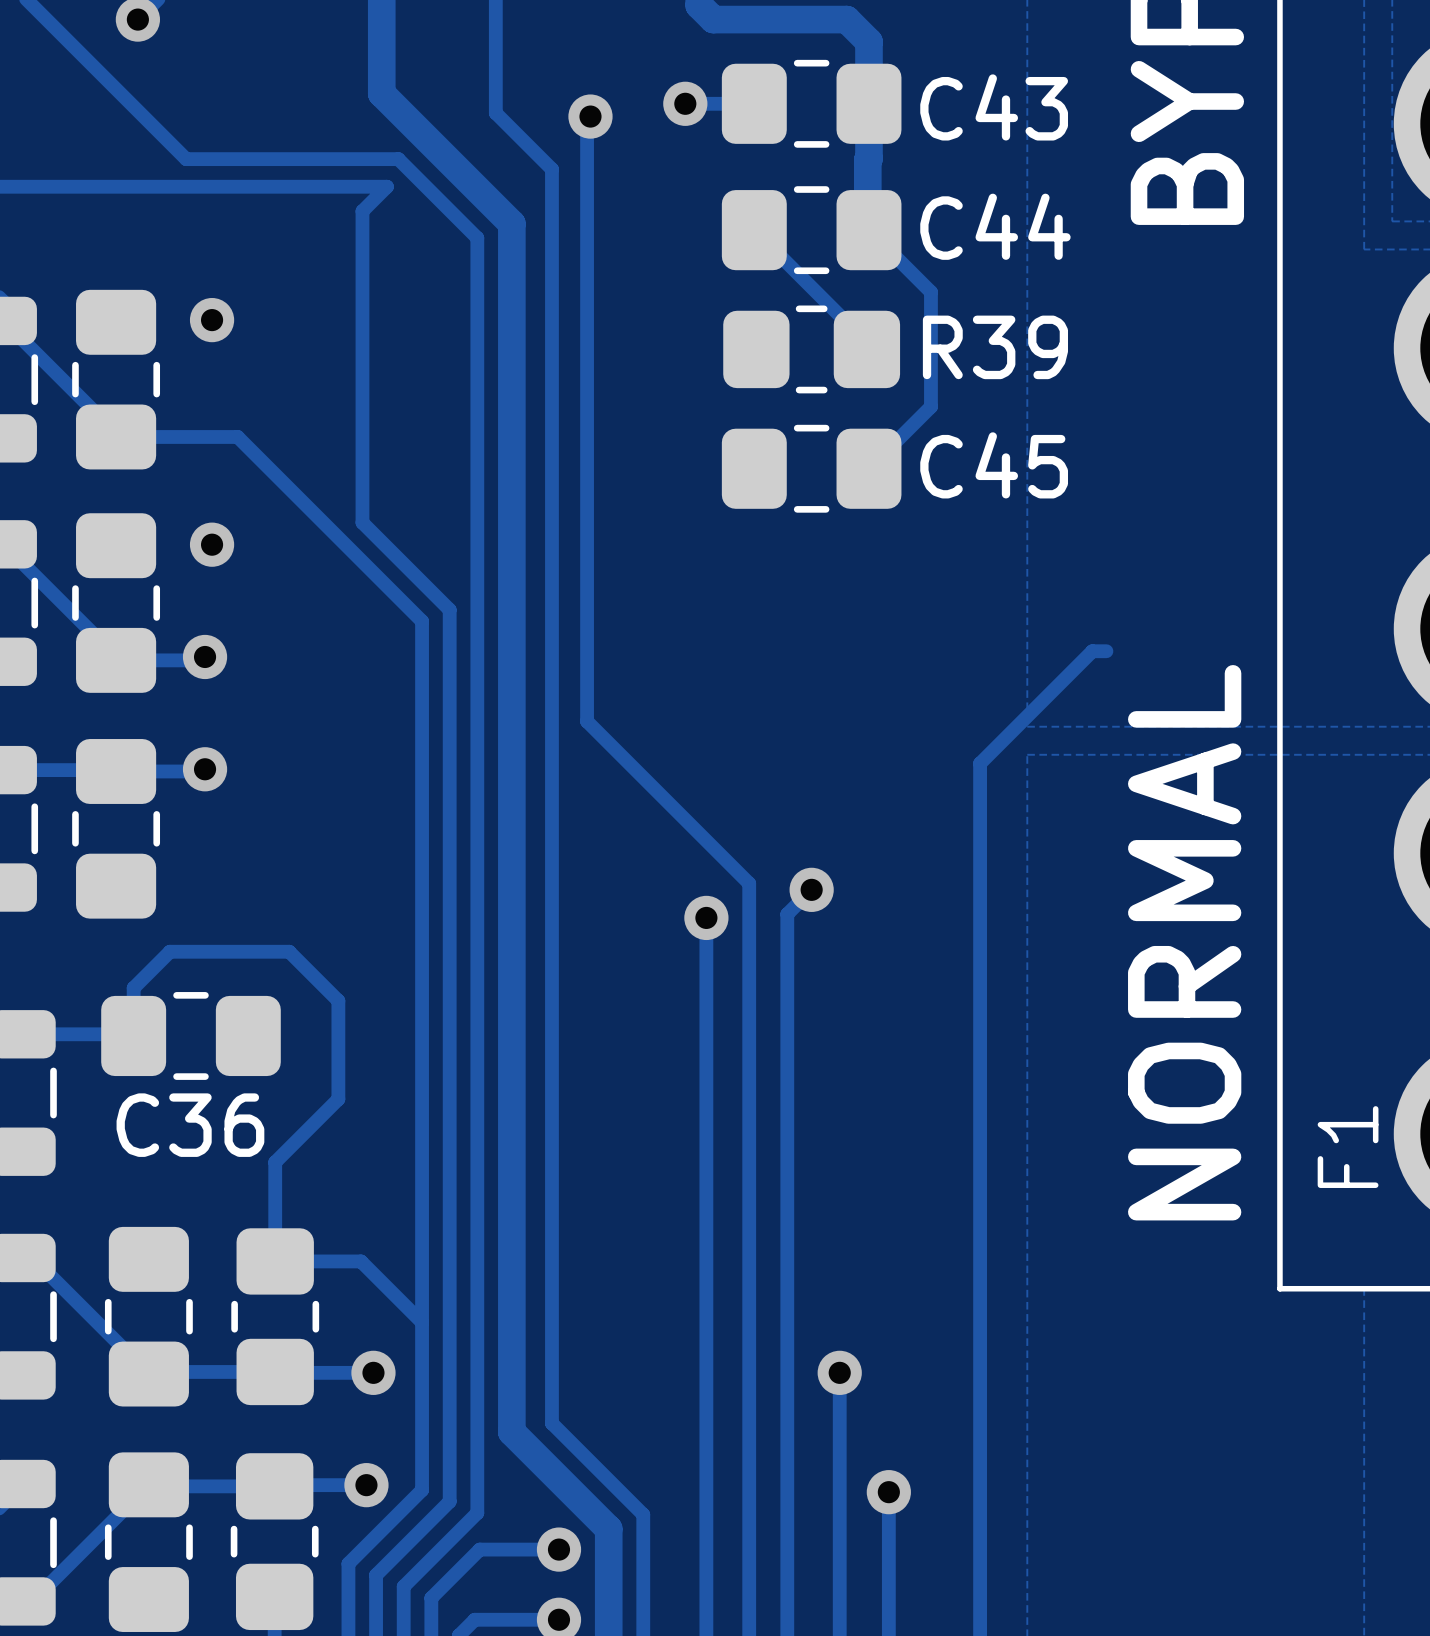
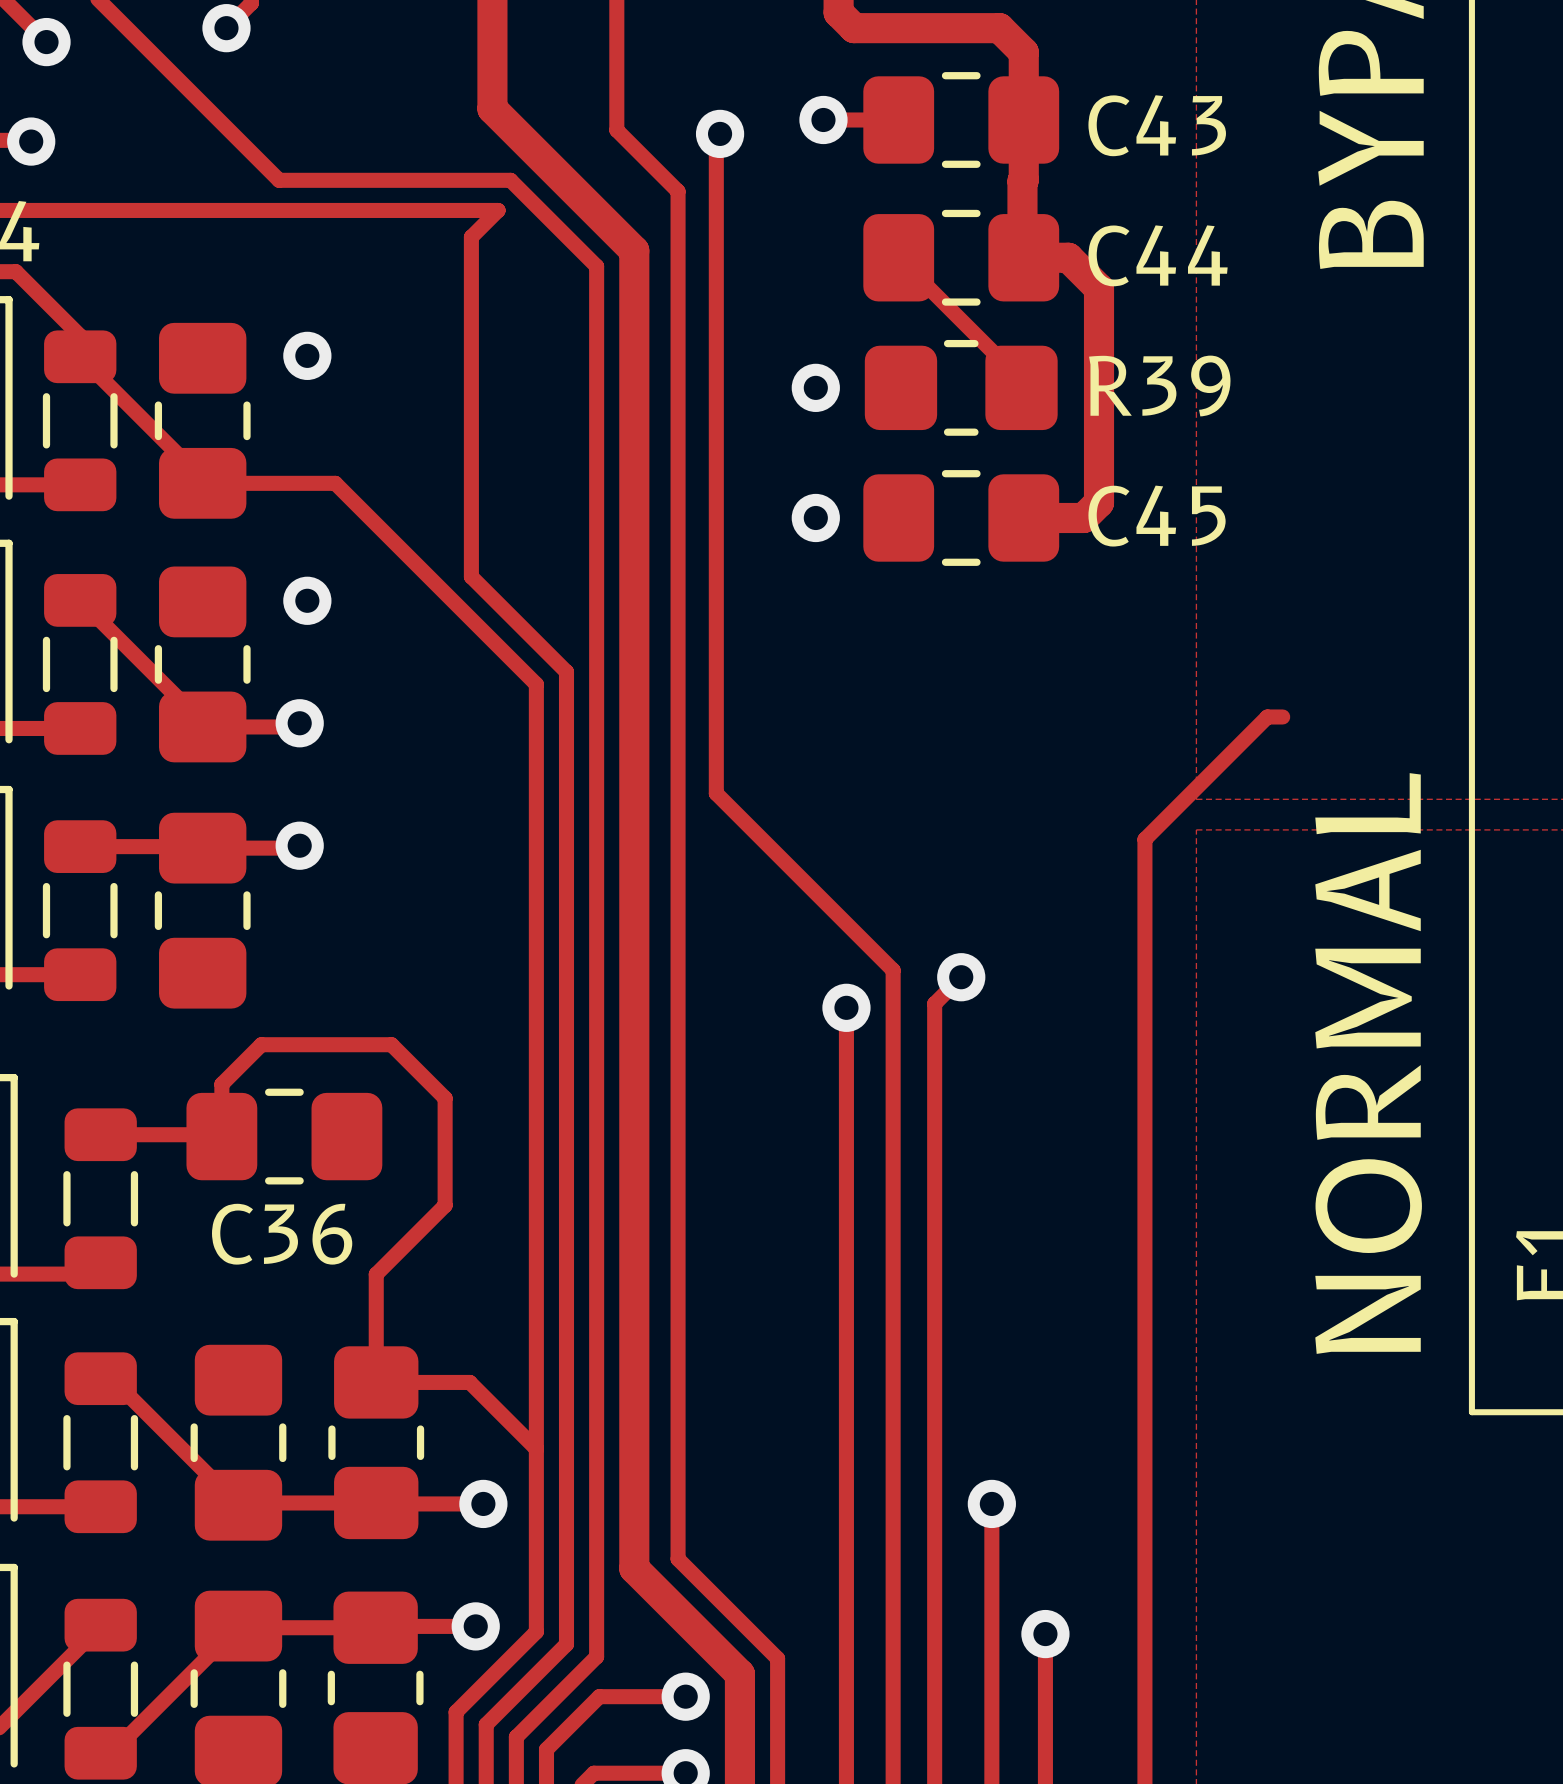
track: (868, 230) (930, 292) (930, 406) (868, 468) -> (1023, 257) (1068, 257) (1099, 288) (1099, 502) (1083, 517) (1023, 517)
via: none -> (815, 387)
via: none -> (815, 517)

